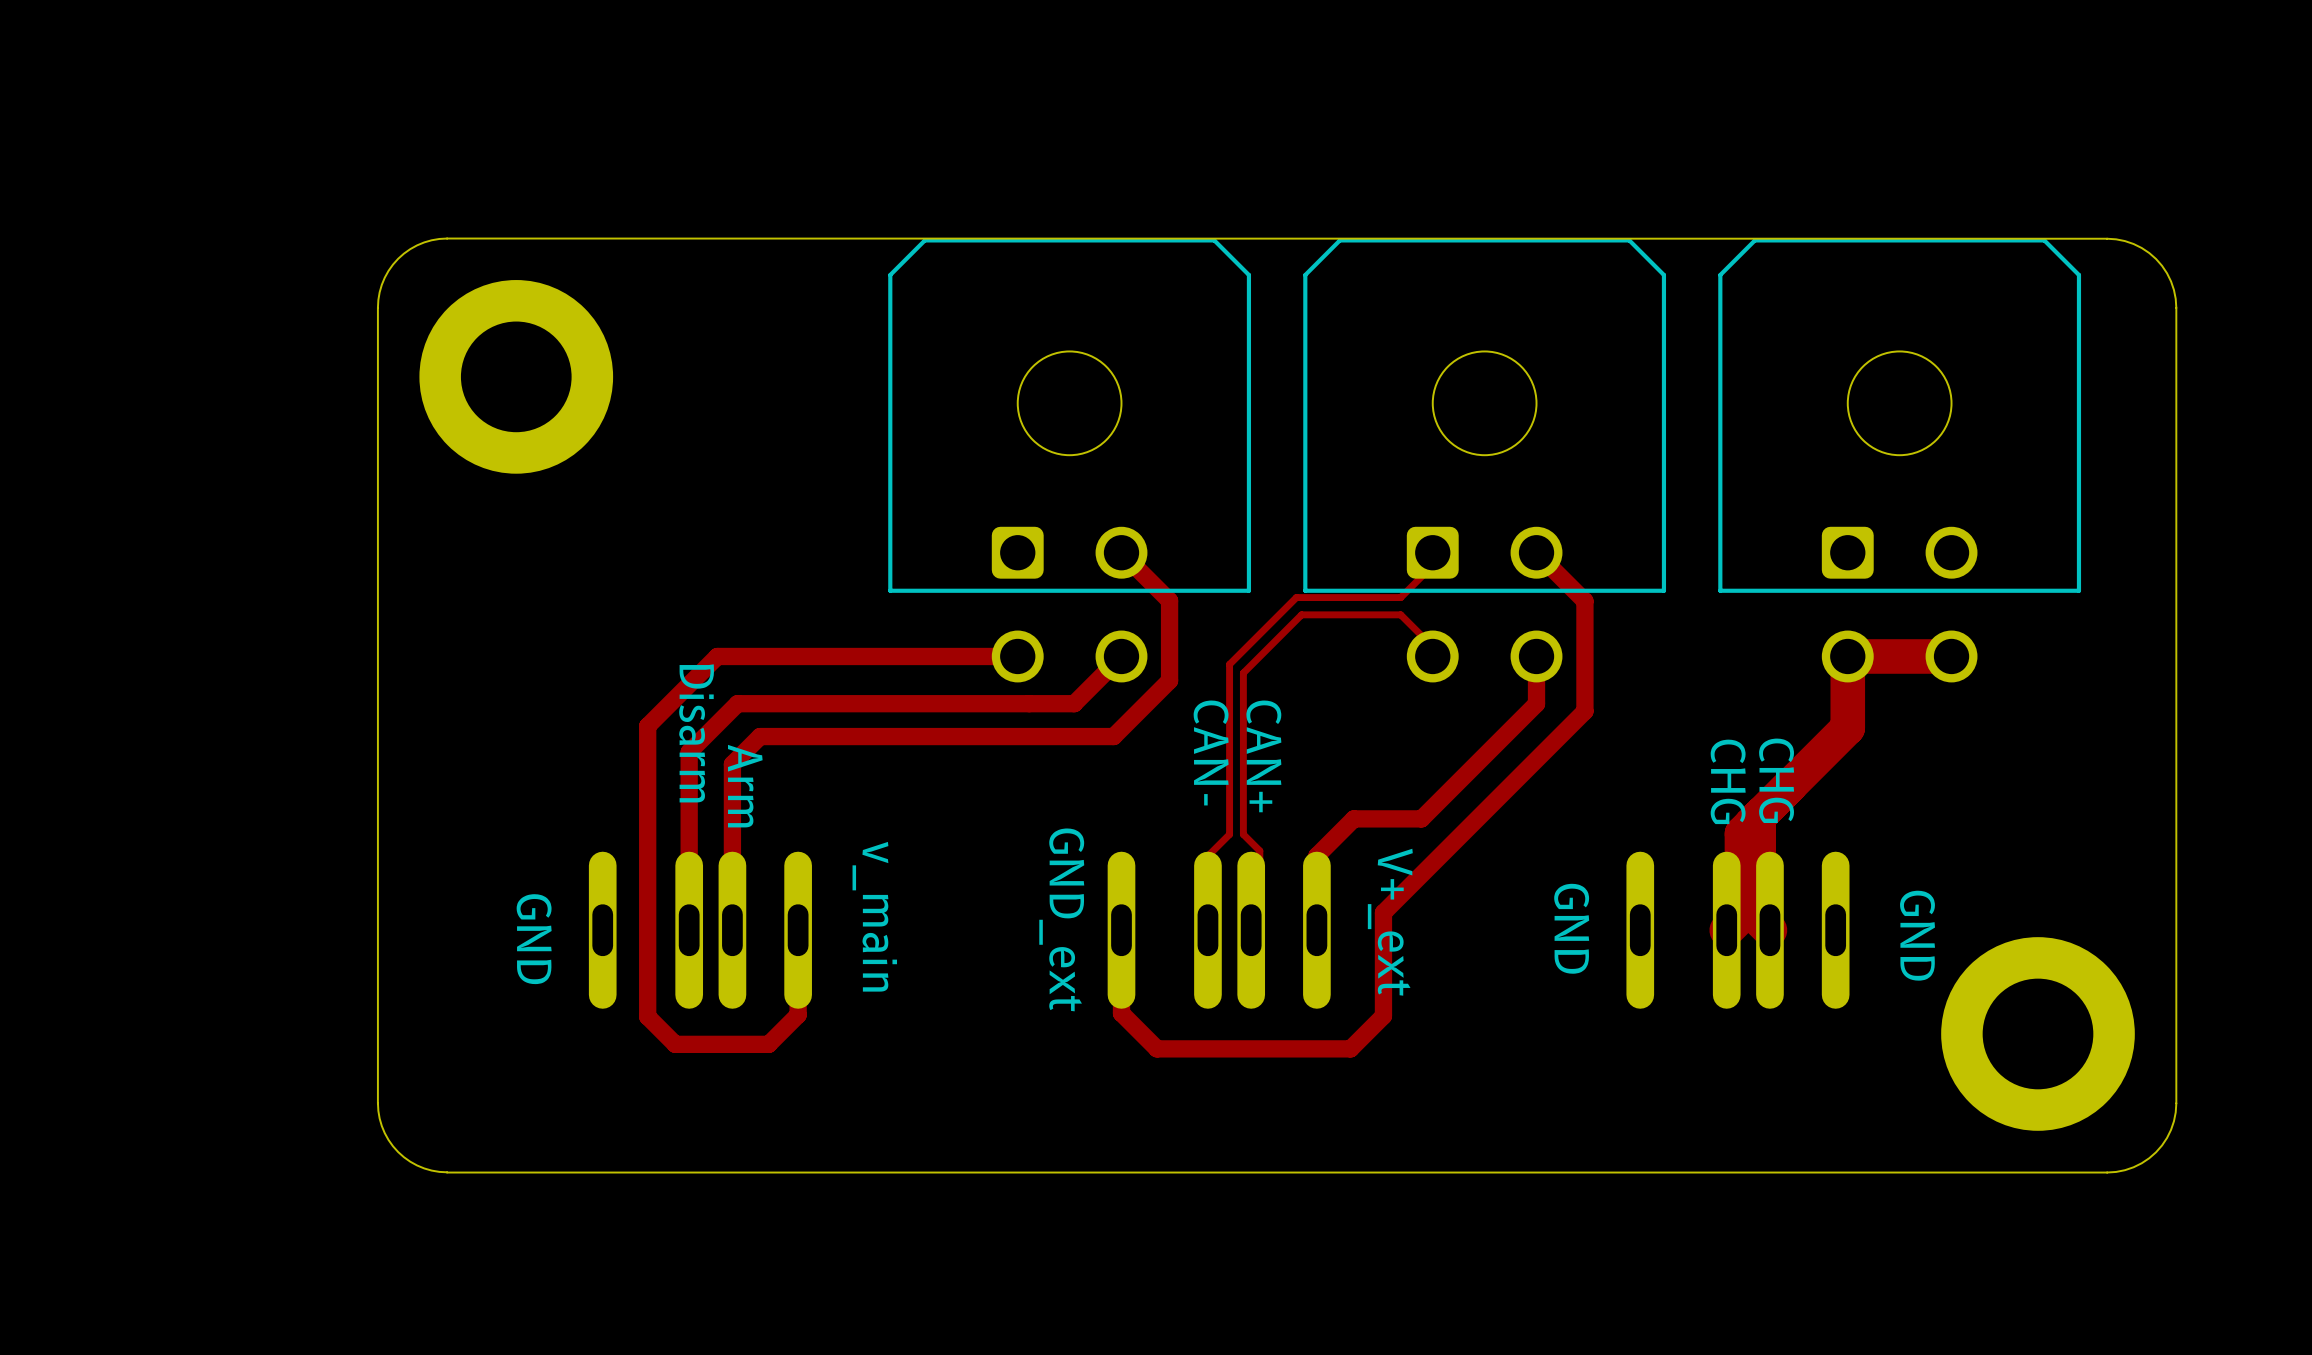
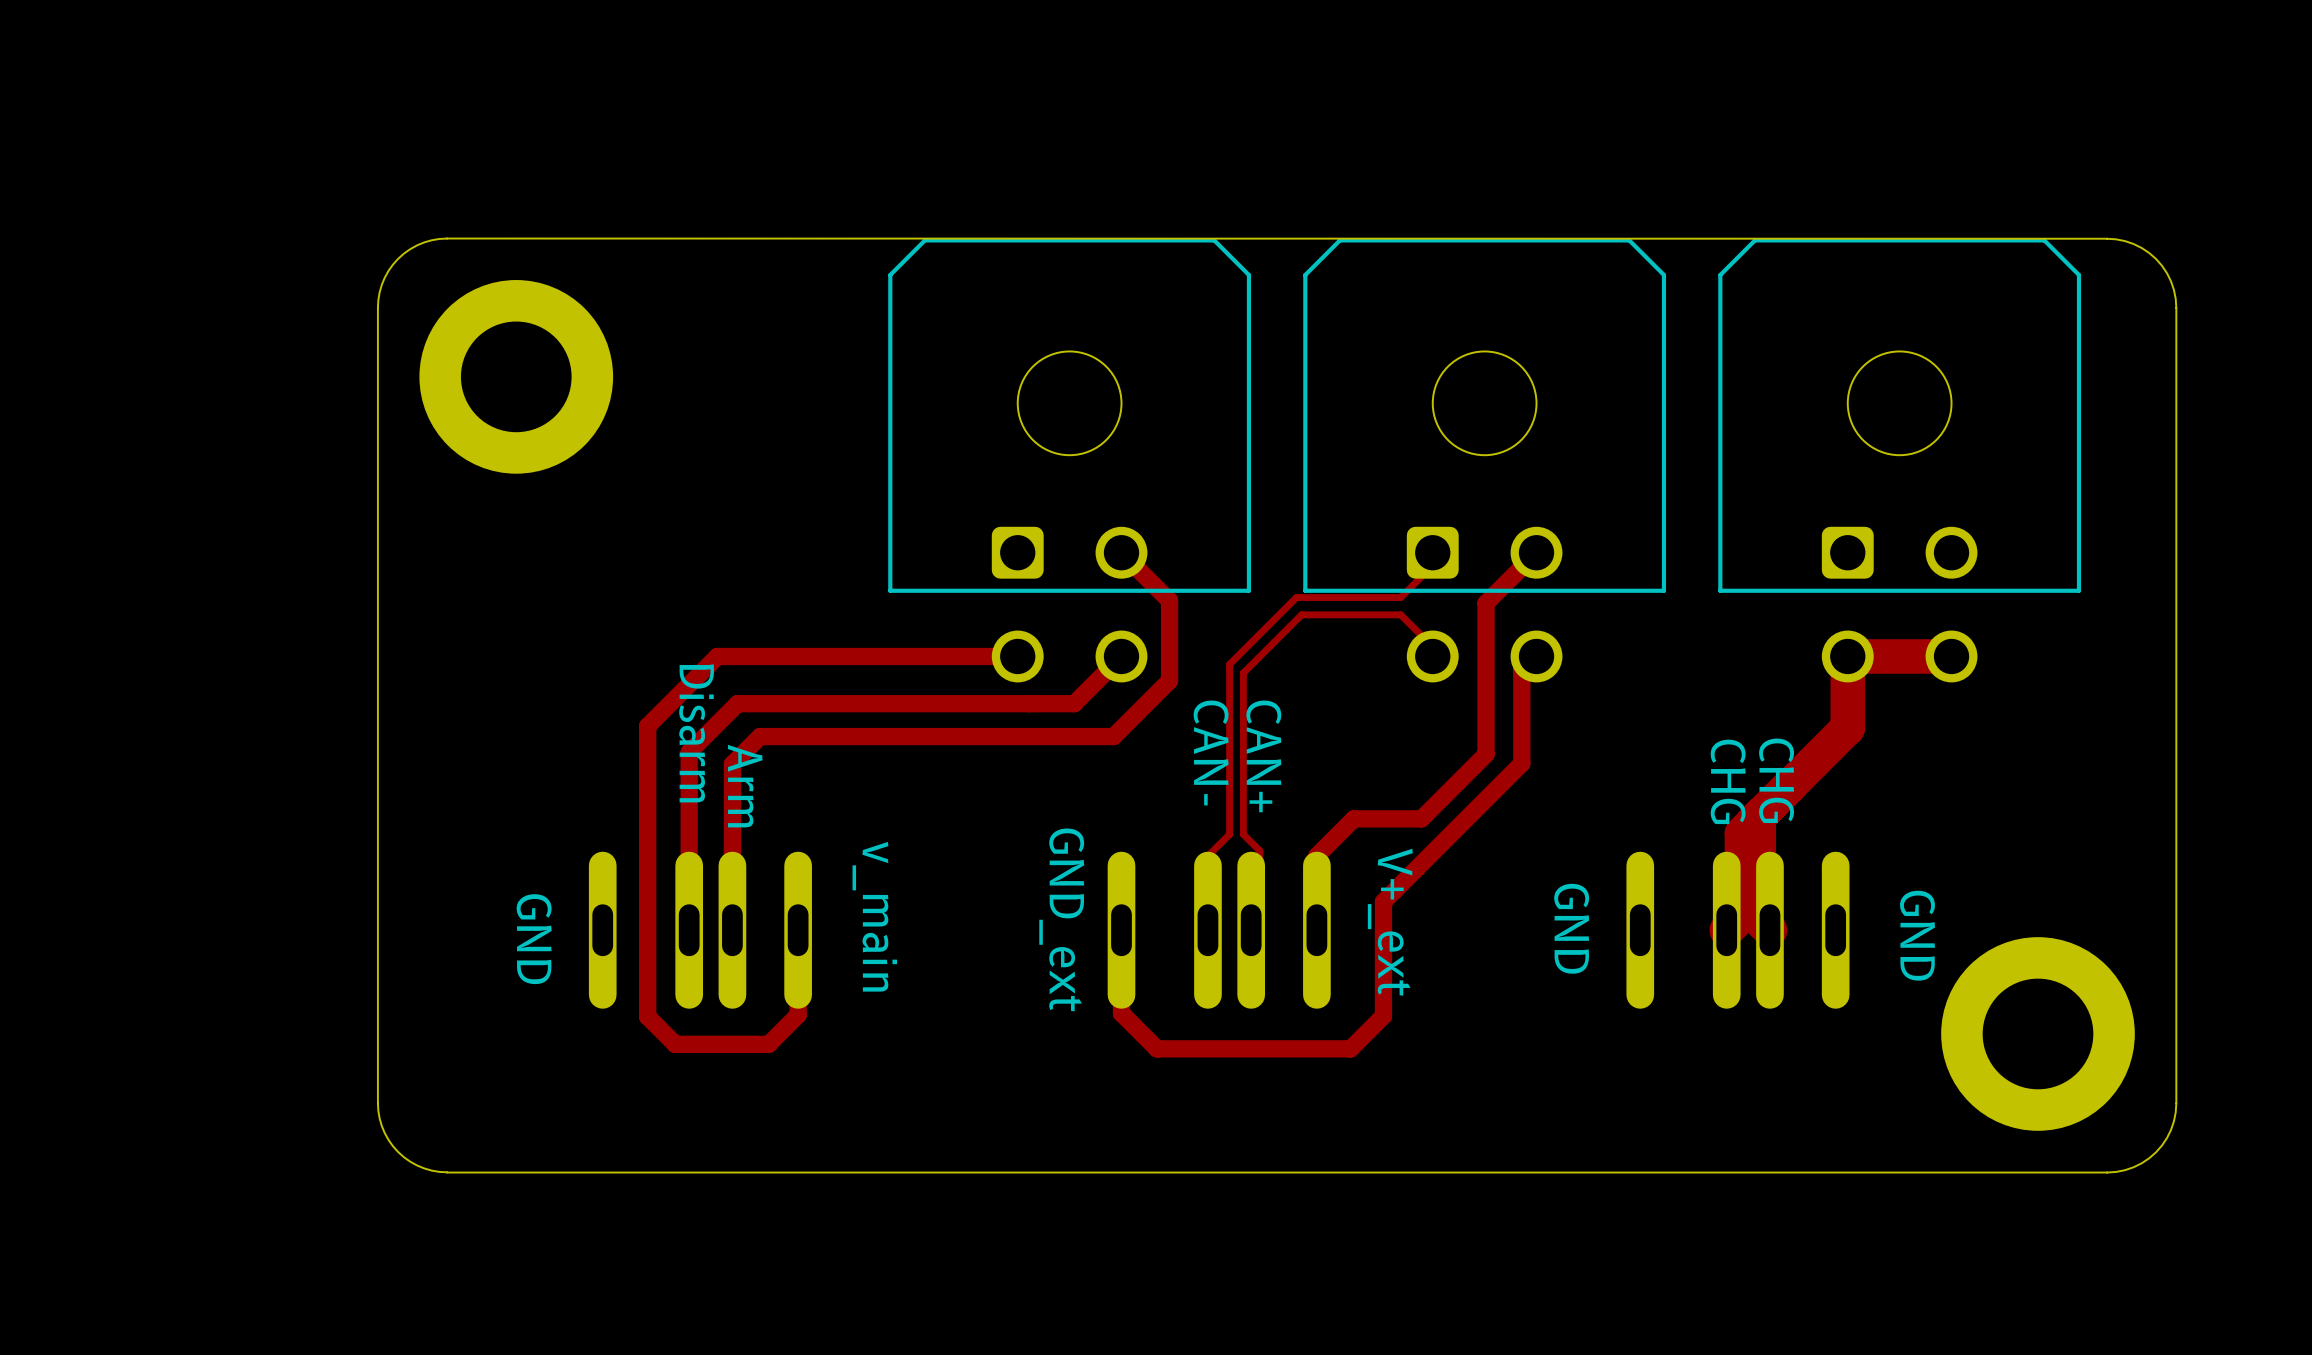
top track: (1536, 552) (1584, 601) (1584, 711) (1383, 912) -> (1536, 656) (1521, 671) (1521, 763) (1383, 901) (1383, 912)
top track: (1536, 656) (1536, 703) (1486, 754) -> (1536, 552) (1486, 603) (1486, 754)

